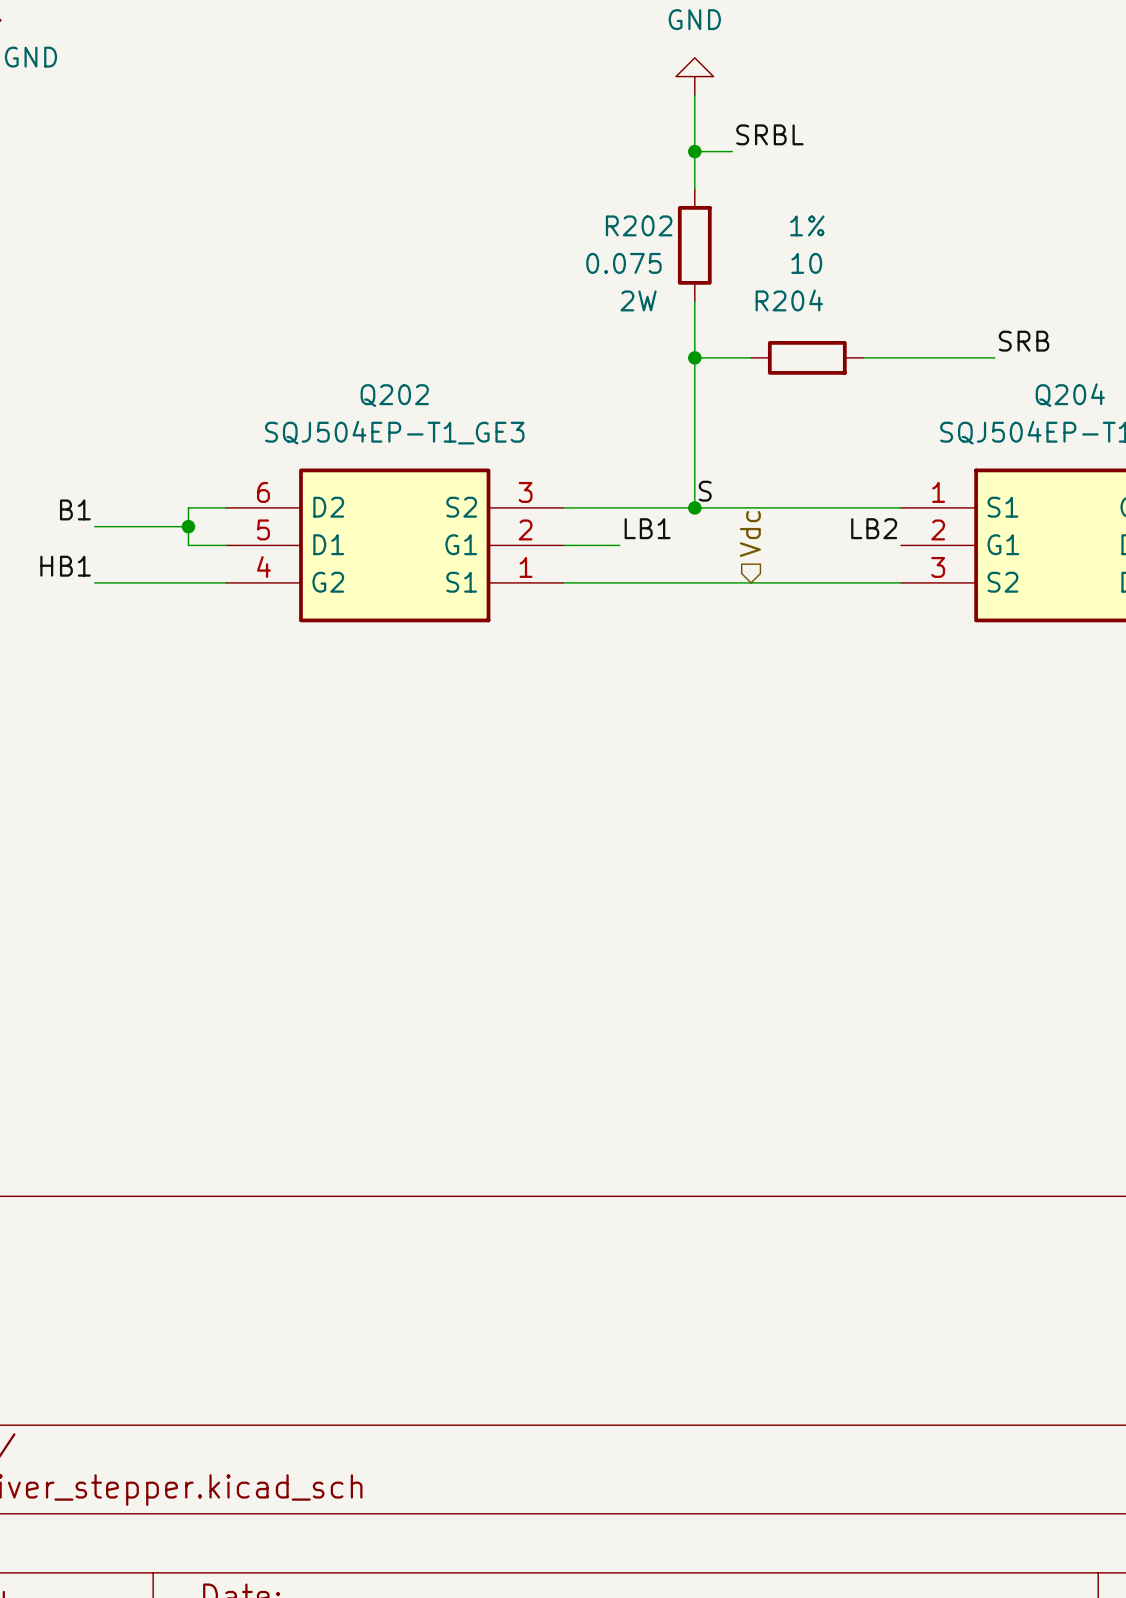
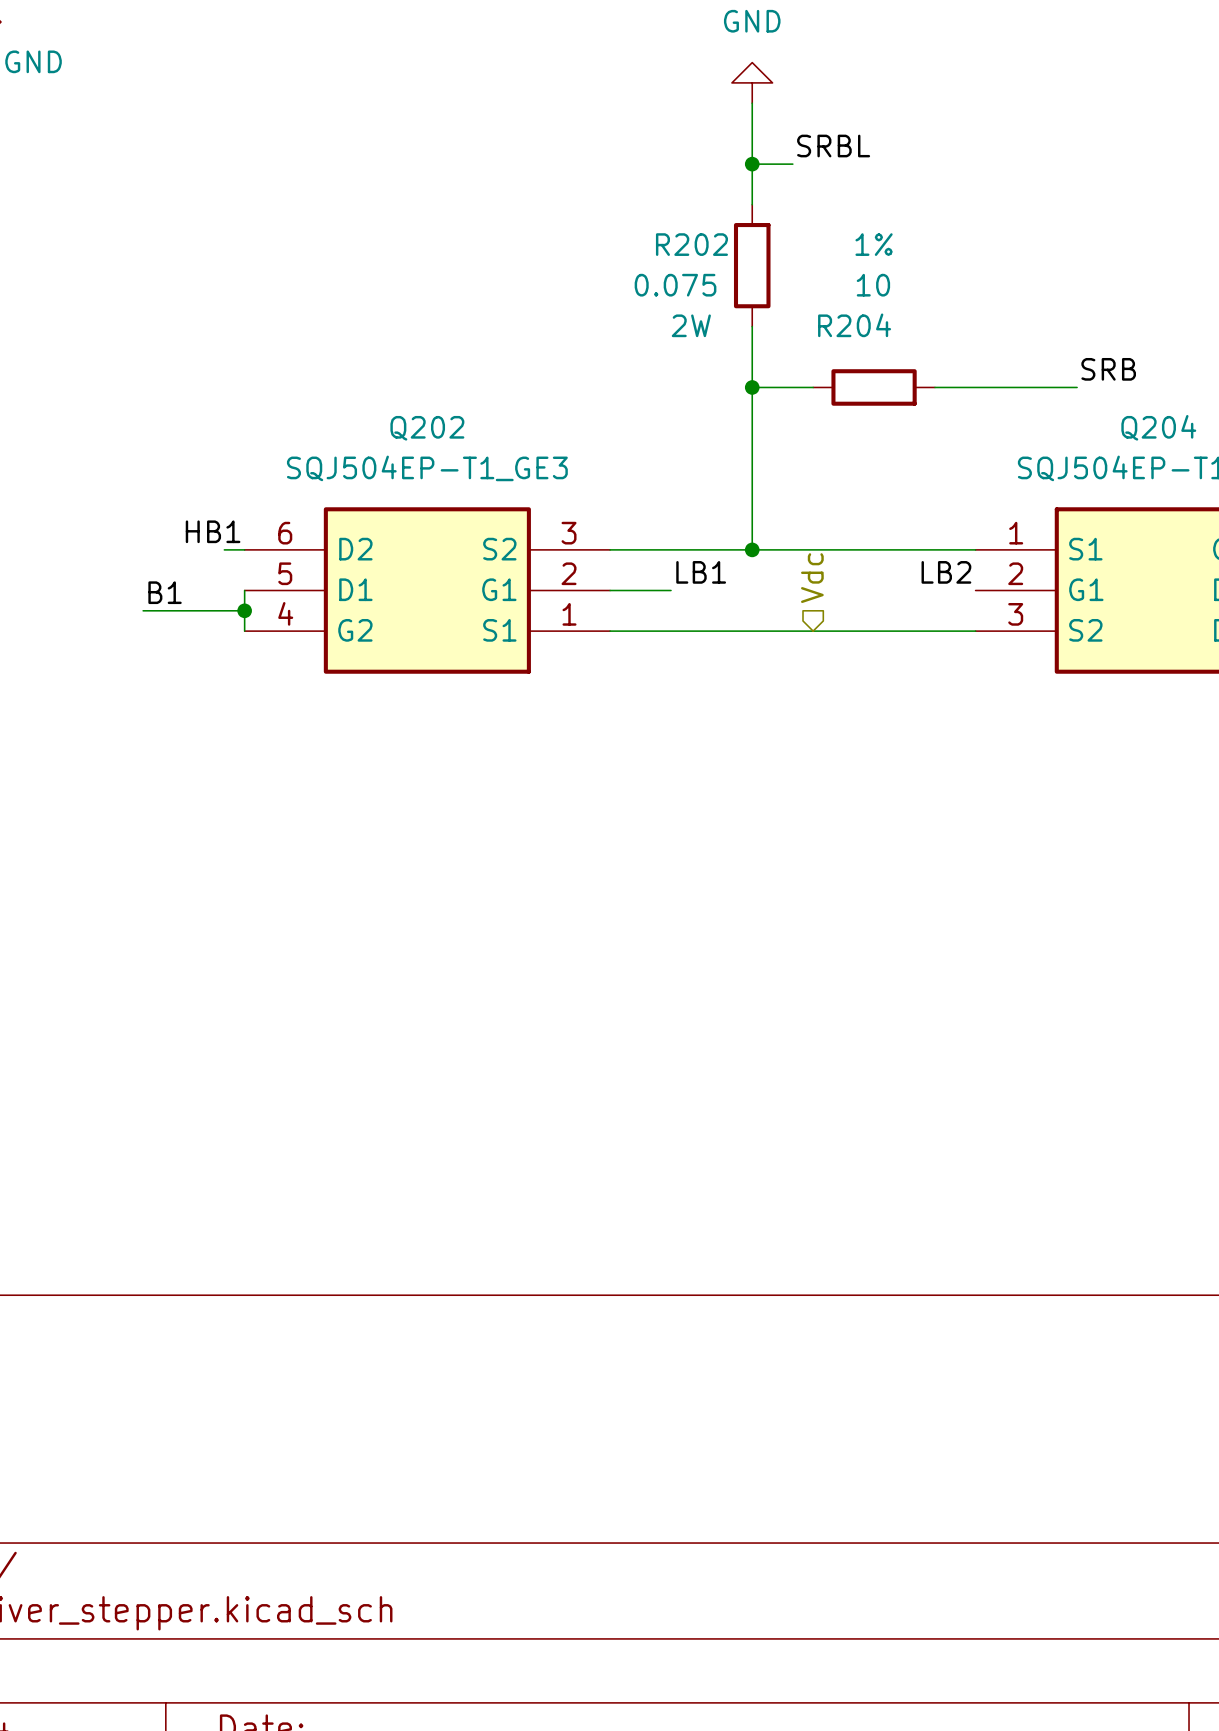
label: S (705, 491) -> none
wire: (207, 507) (188, 507) (188, 545) (225, 545) -> (244, 631) (244, 590)
label position: B1 (75, 509) -> B1 (165, 592)
wire: (94, 526) (188, 526) -> (143, 610) (244, 610)
junction position: (188, 526) -> (244, 610)
label position: HB1 (65, 566) -> HB1 (213, 531)
wire: (94, 582) (225, 582) -> none

